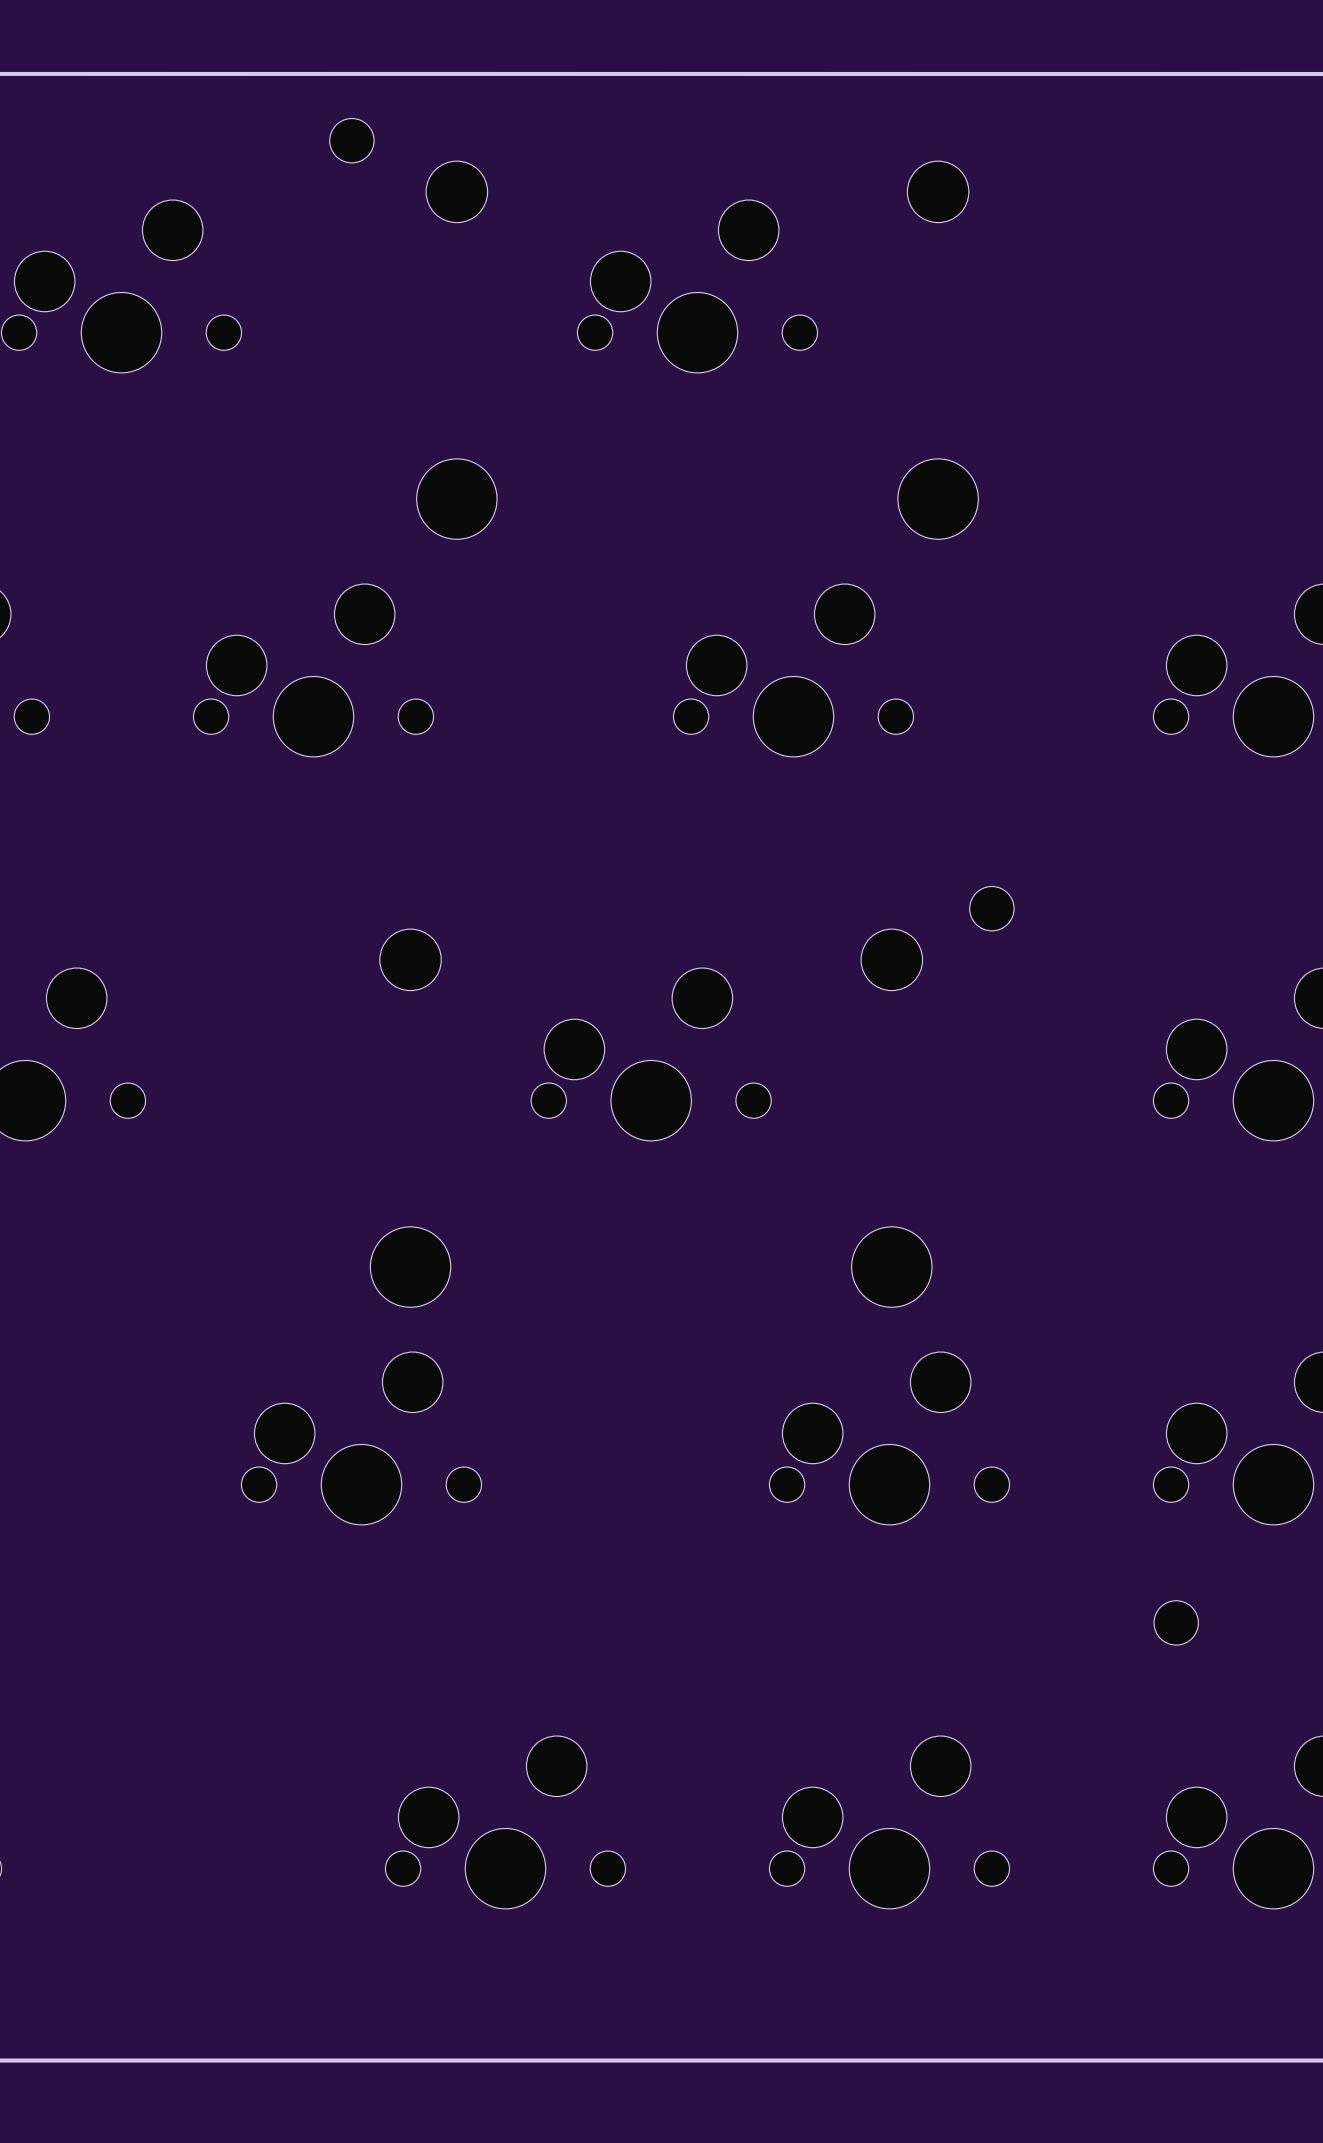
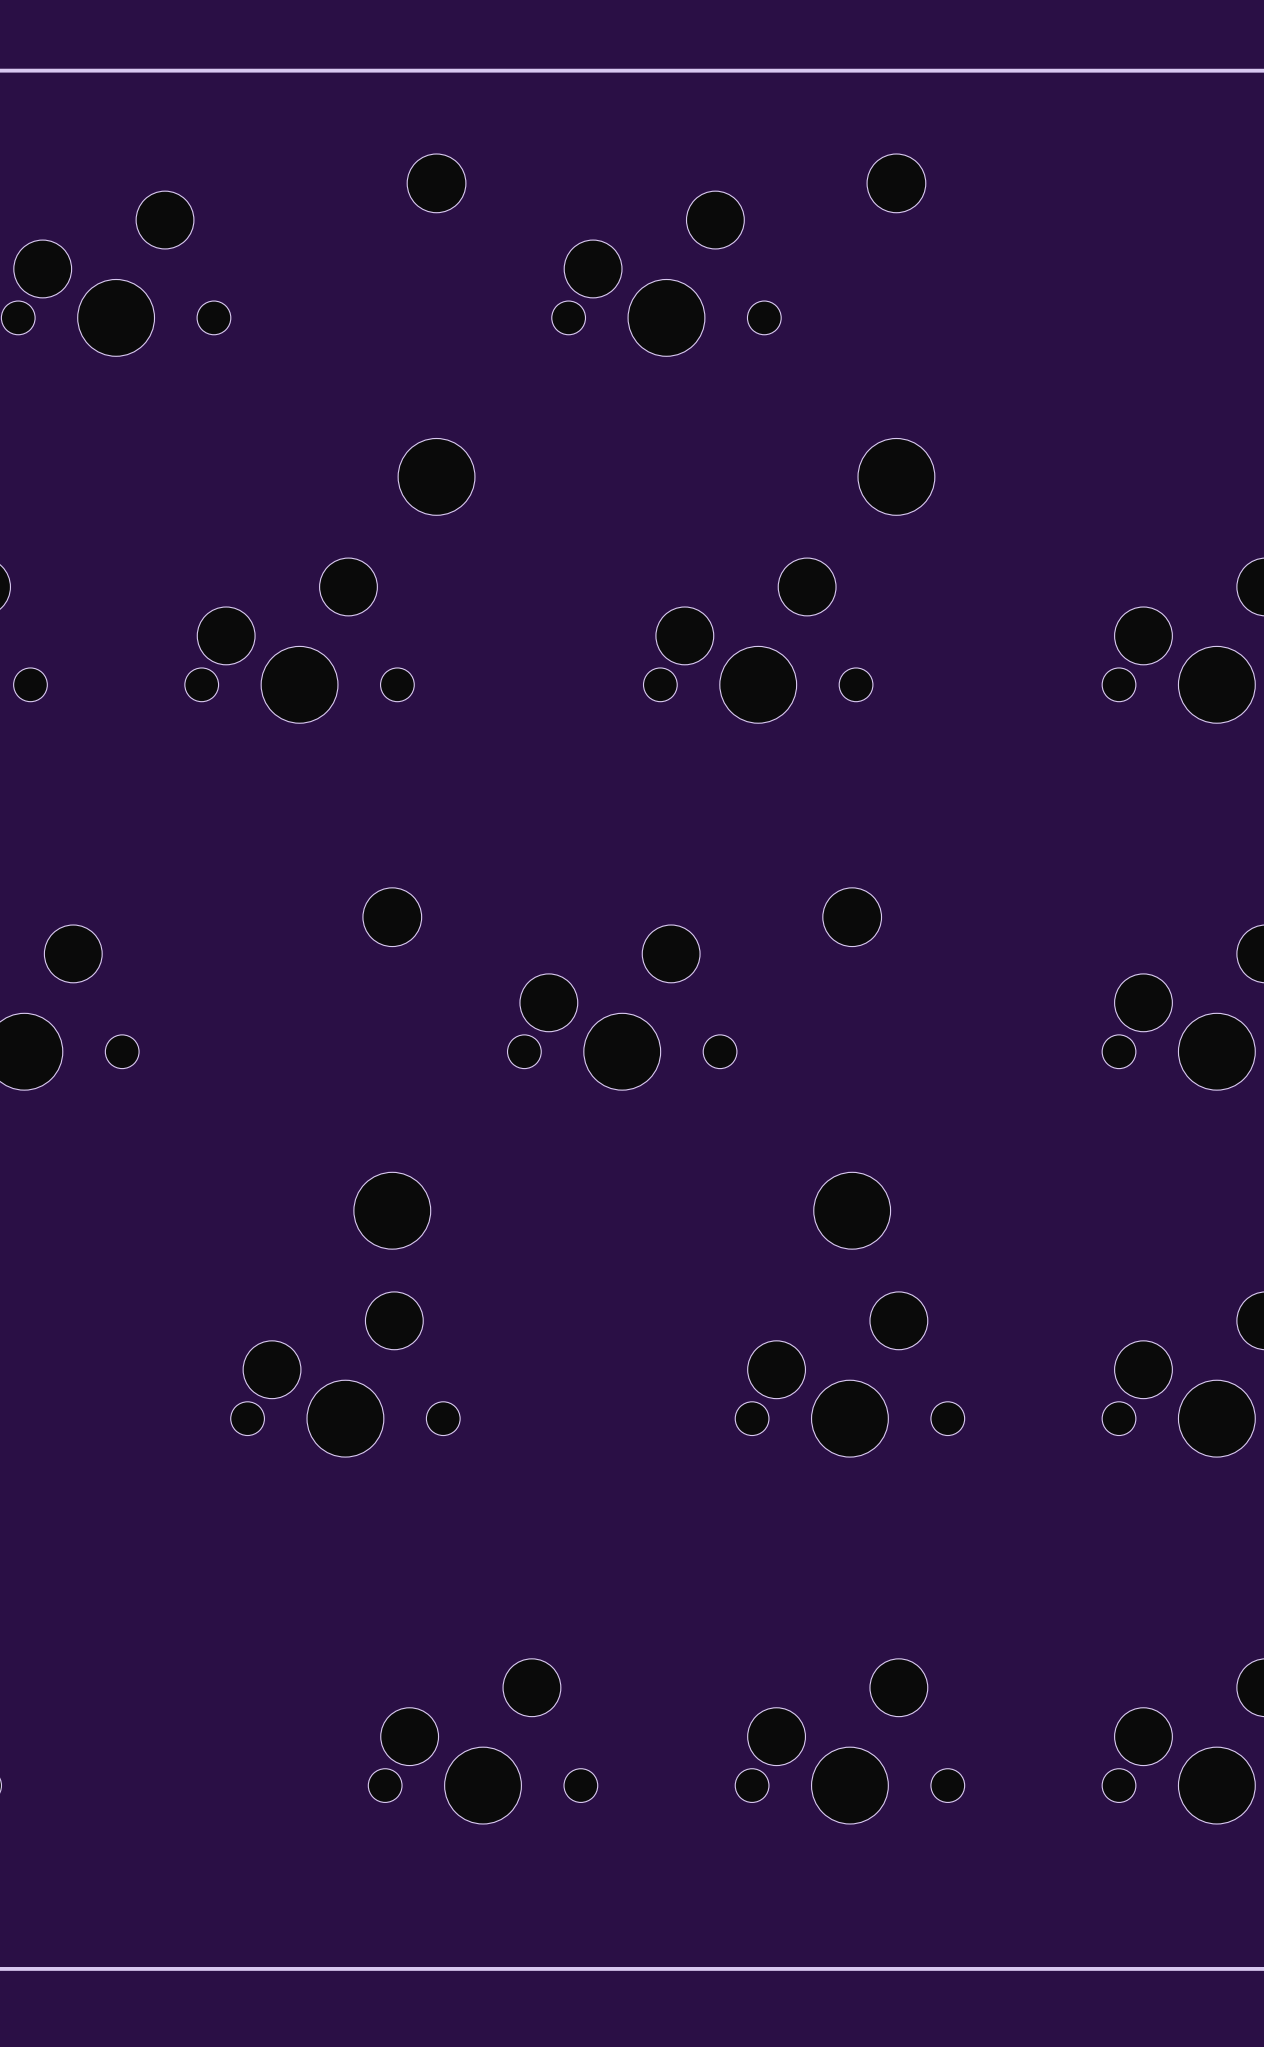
part: (351, 140) -> none
part: (991, 908) -> none
part: (1176, 1622) -> none

